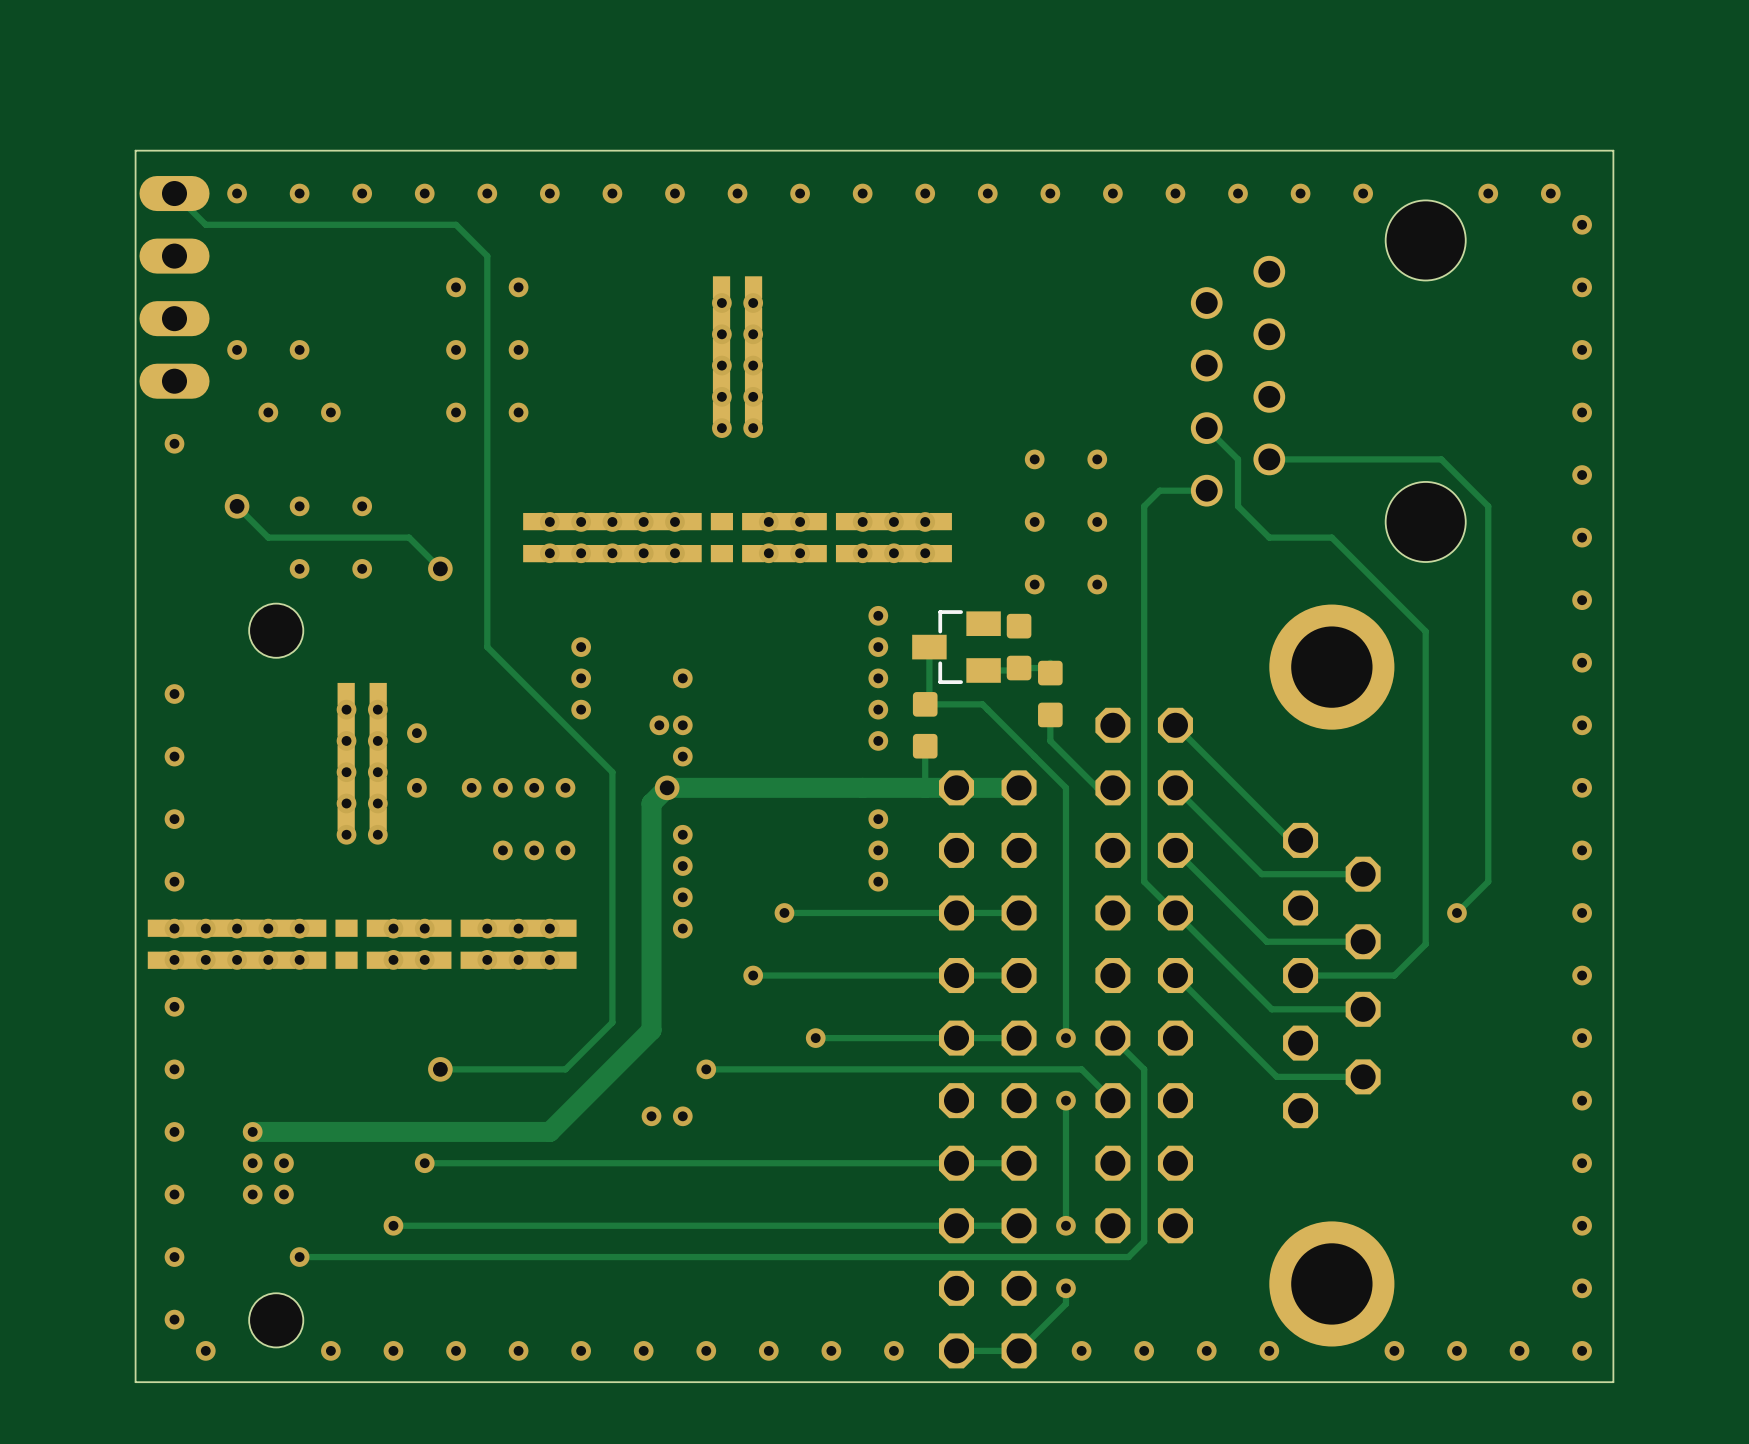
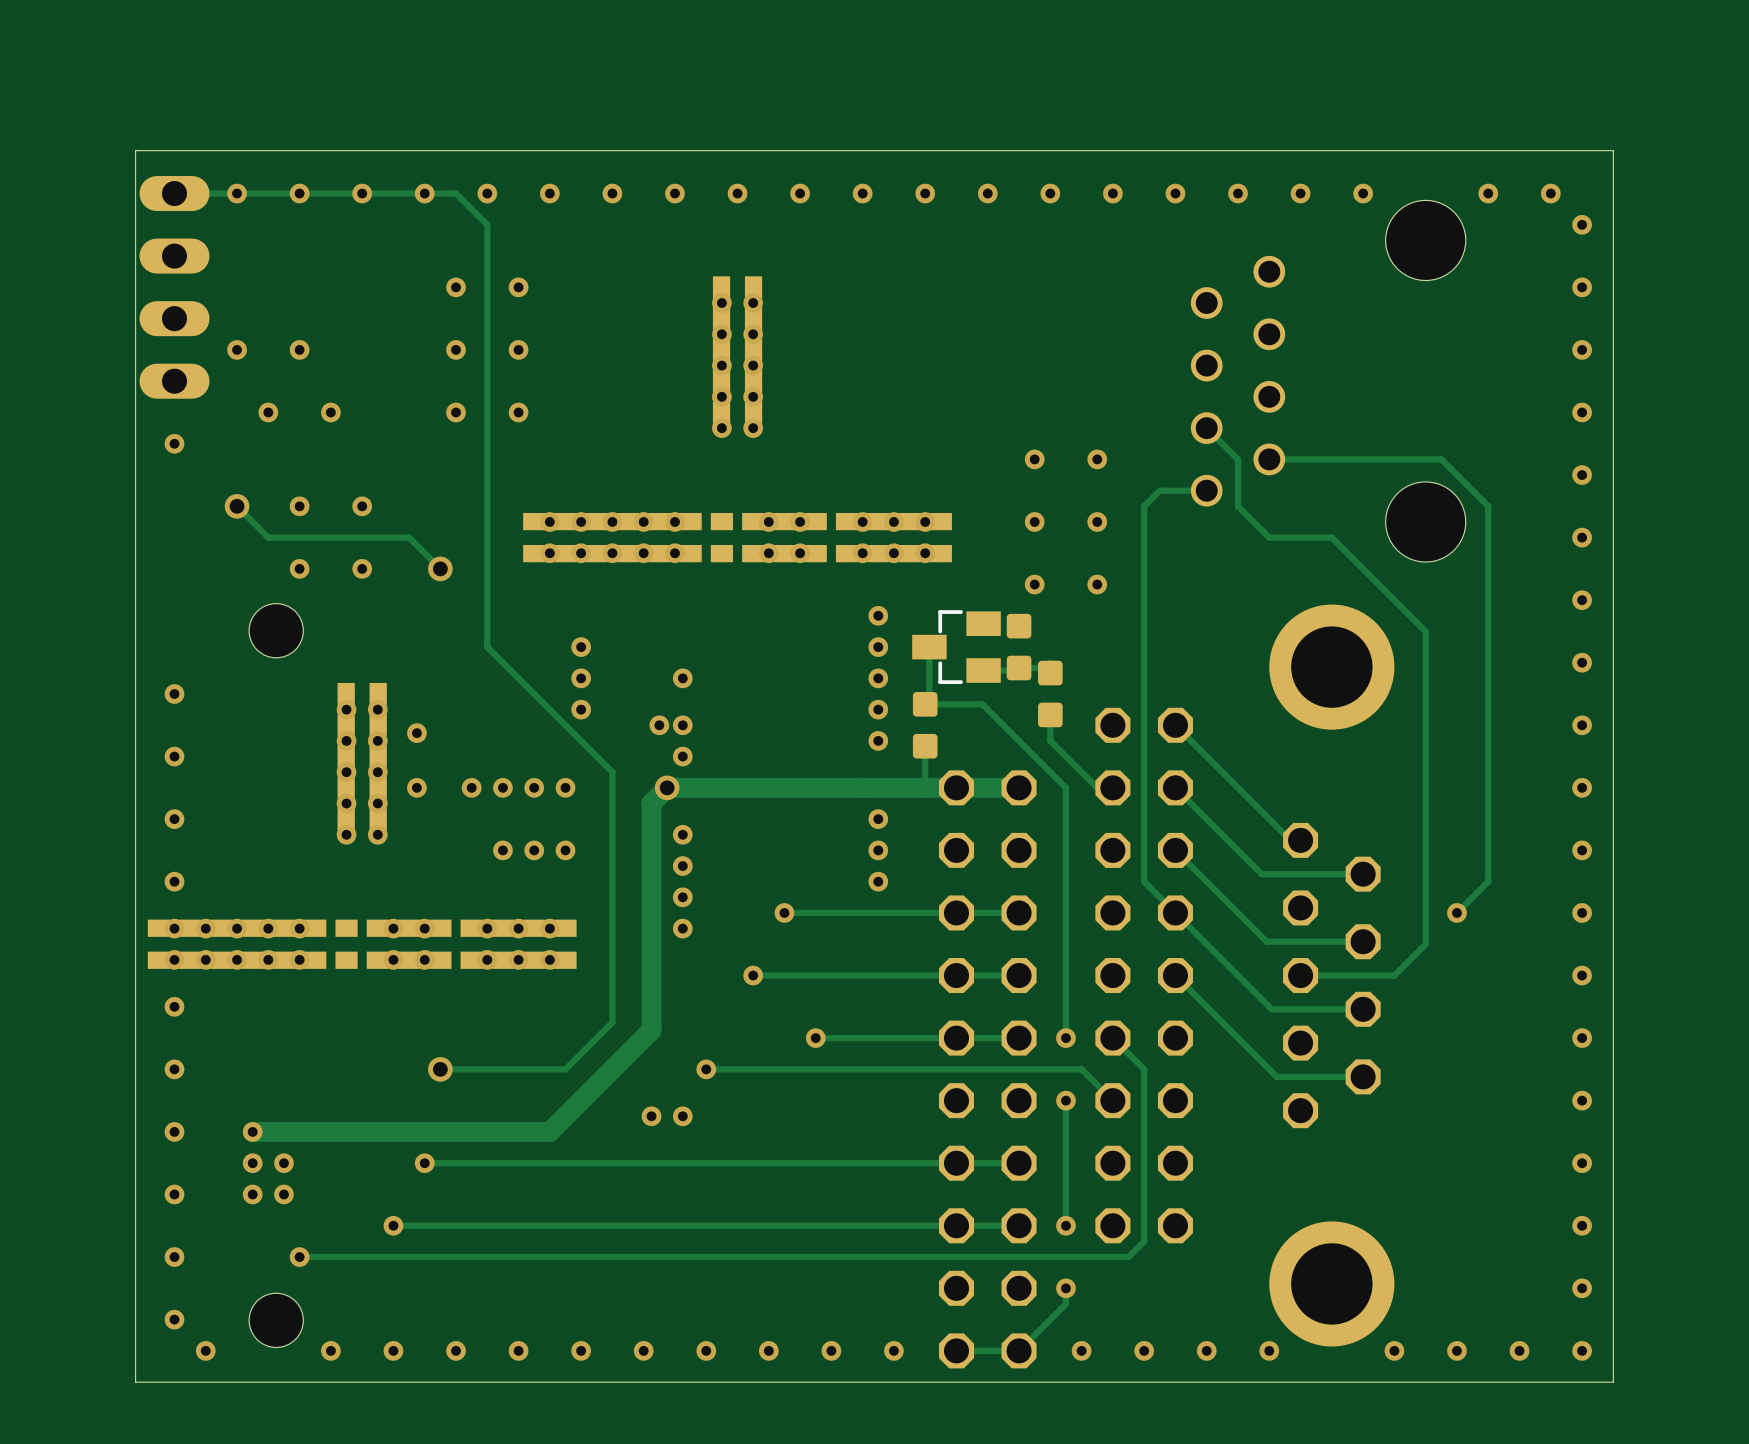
track: (174, 193) (205, 224) (456, 224) (487, 256) -> (174, 193) (456, 193) (487, 224) (487, 256)

